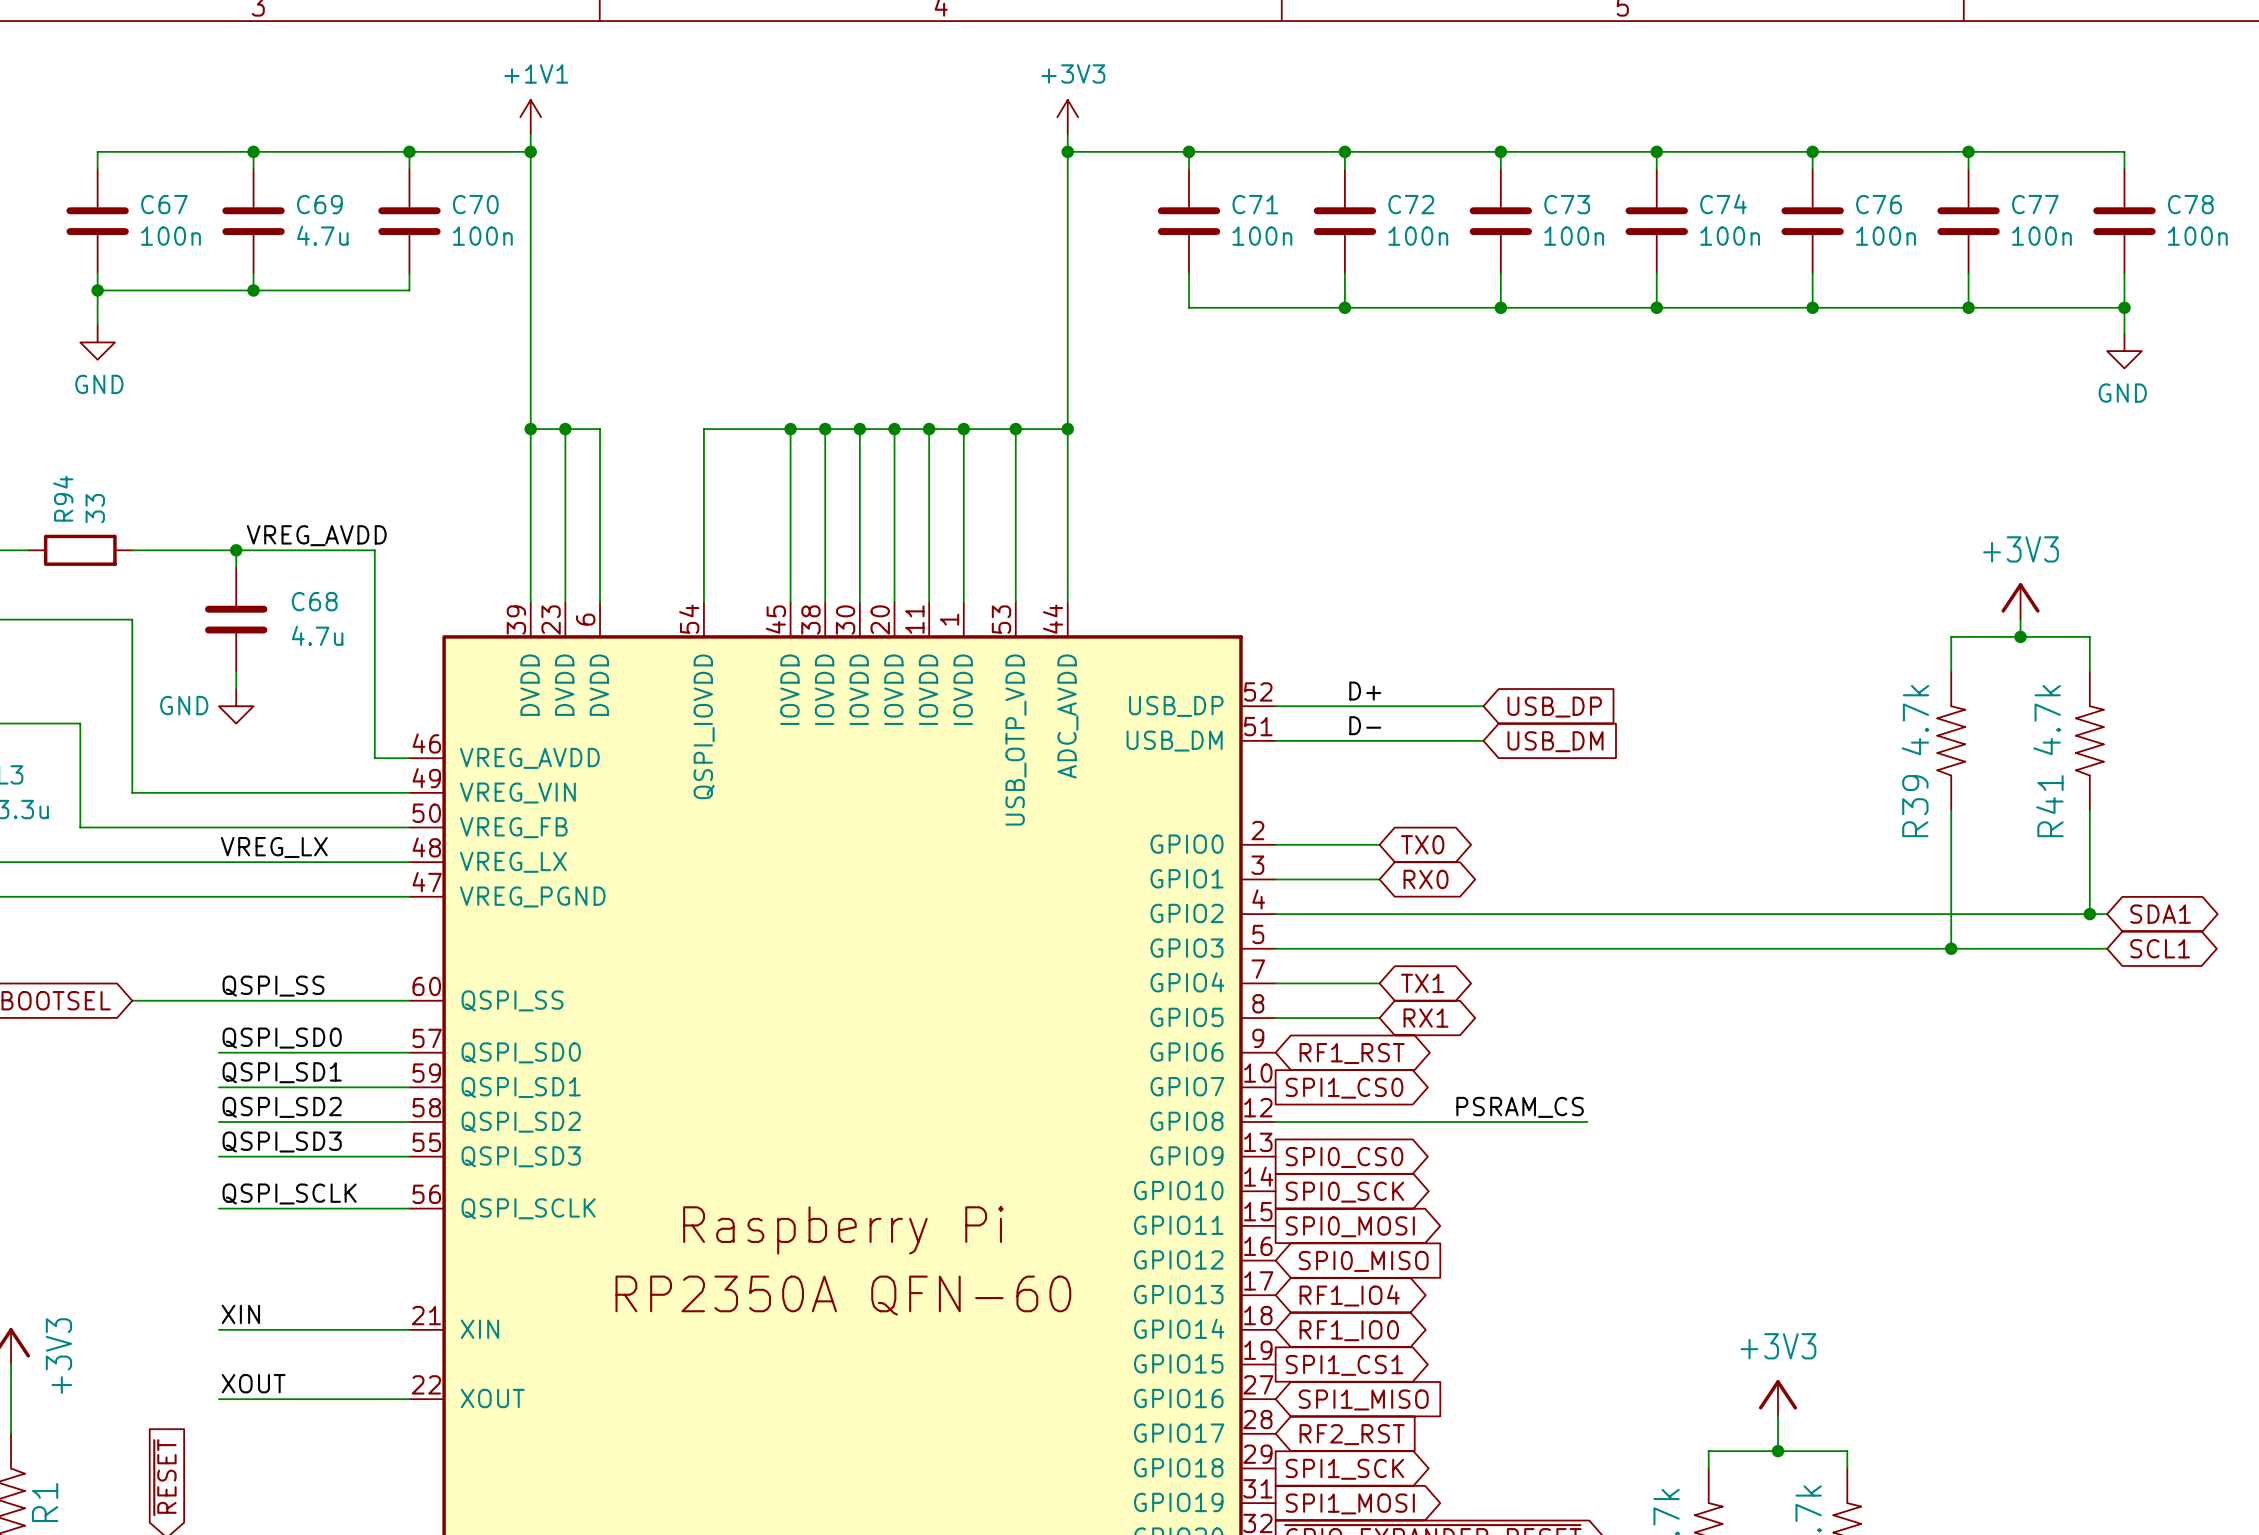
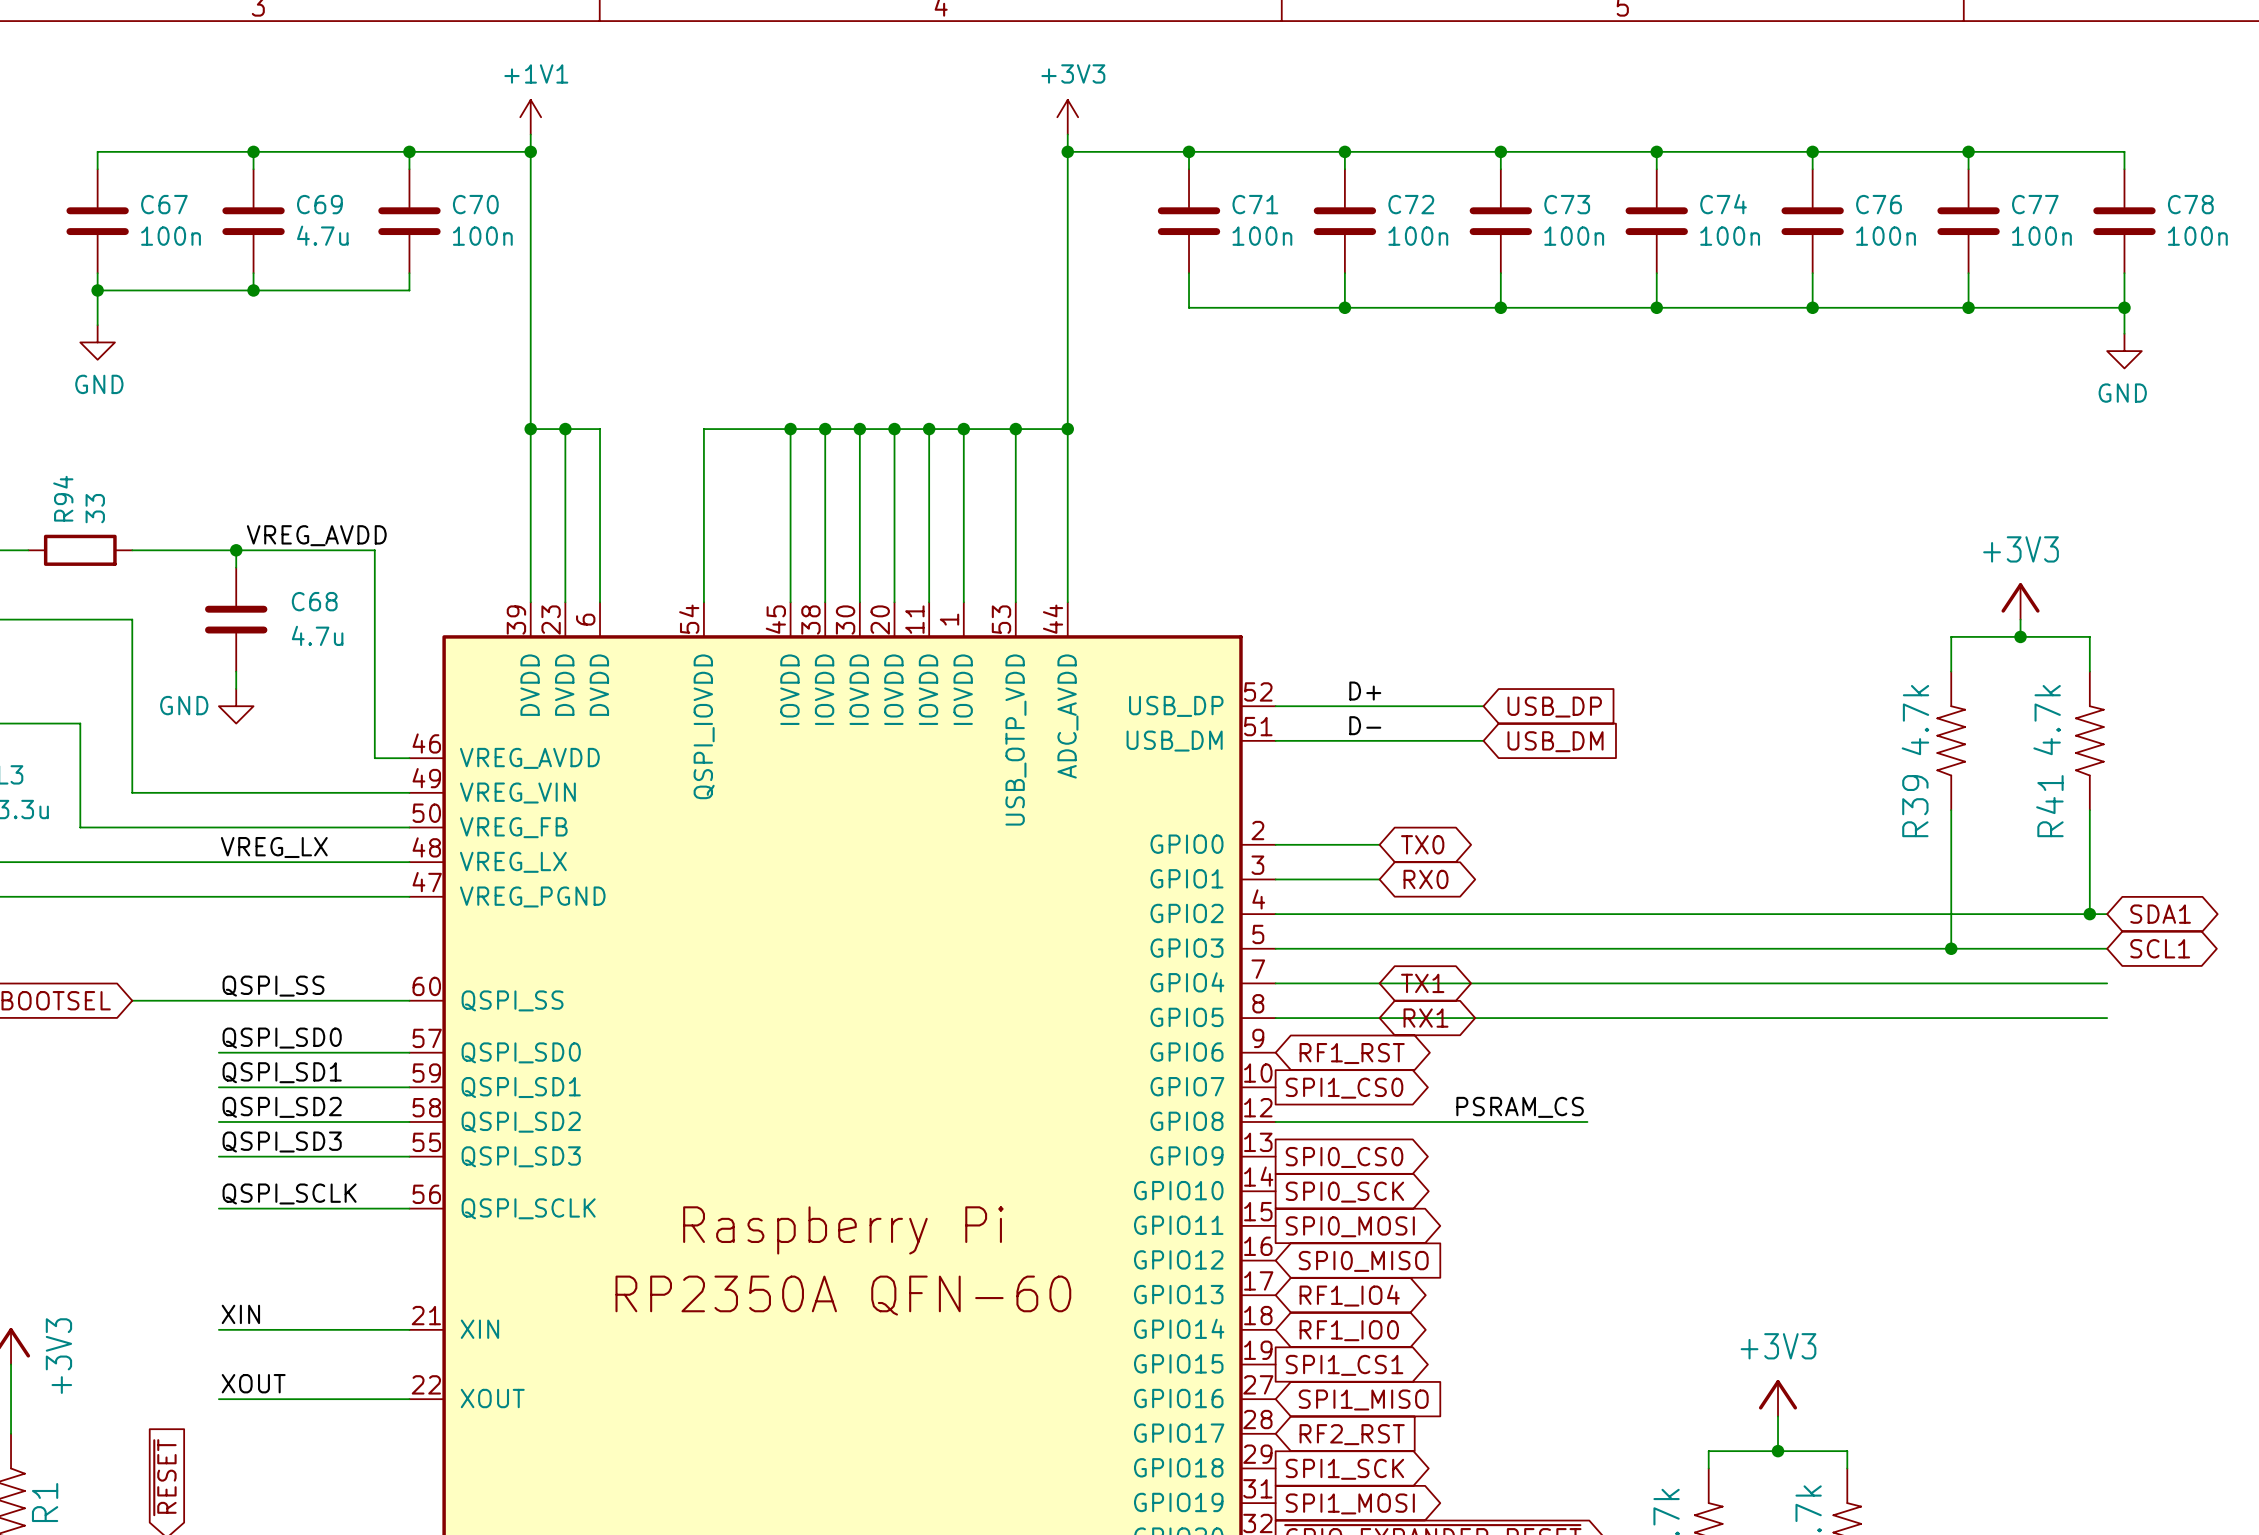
wire: none -> (1379, 983) (2107, 983)
wire: none -> (1379, 1018) (2107, 1018)

